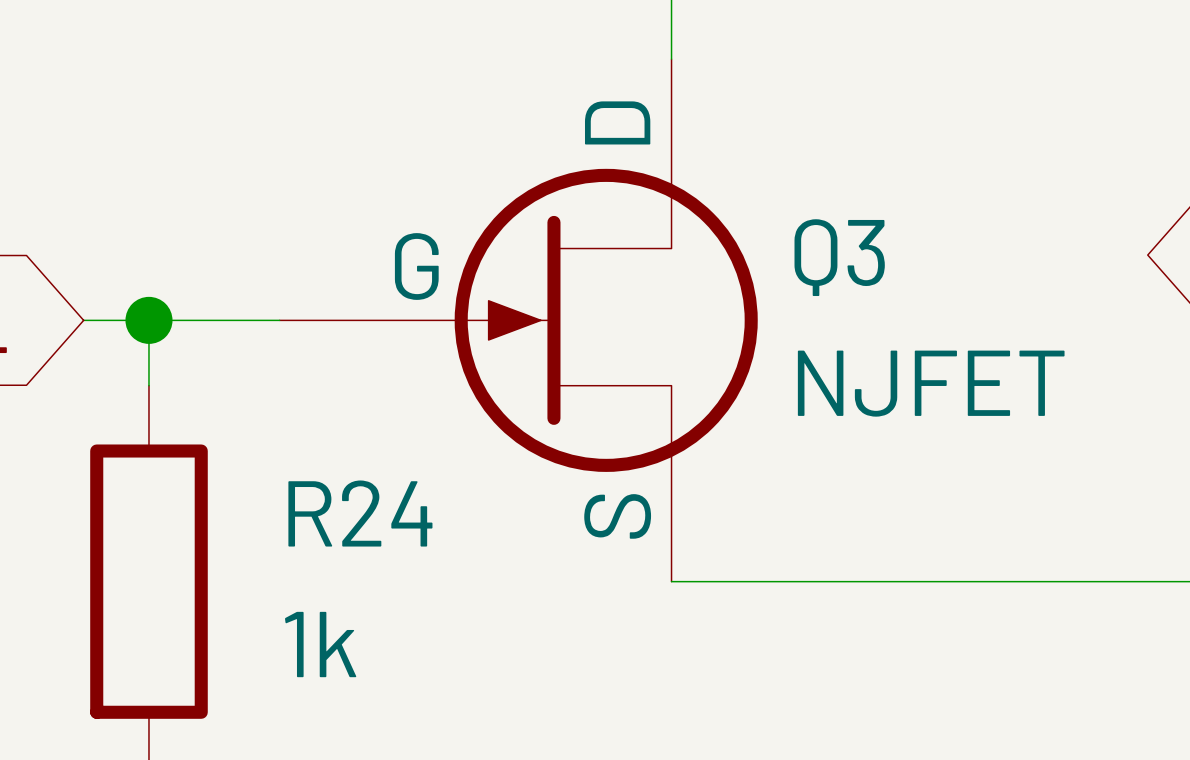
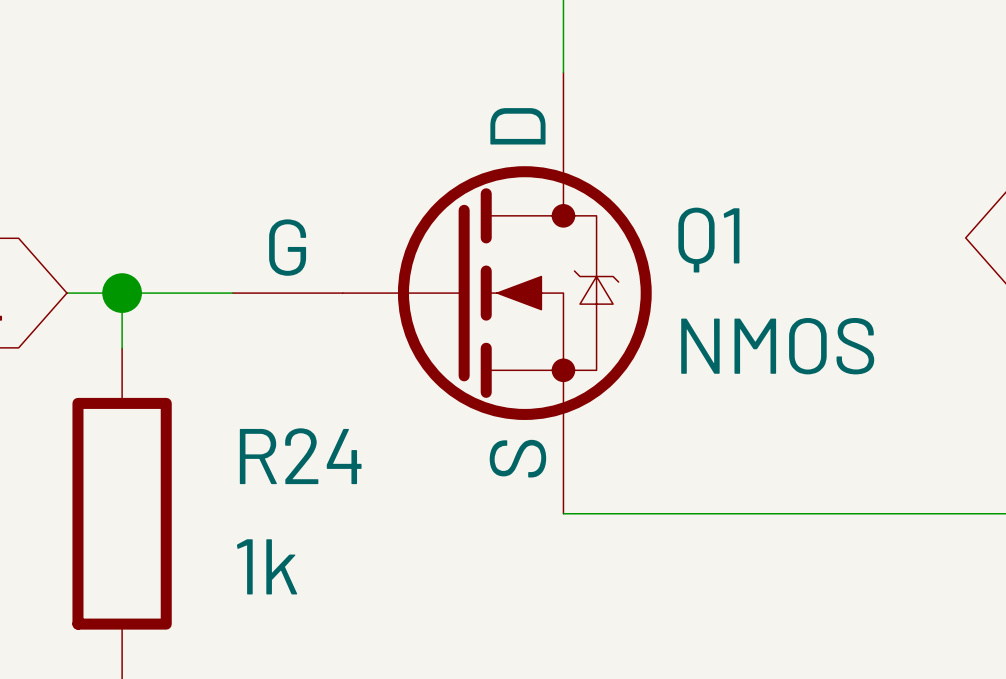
Q3: NJFET (518, 320) -> none
Q1: none -> NMOS (442, 293)

